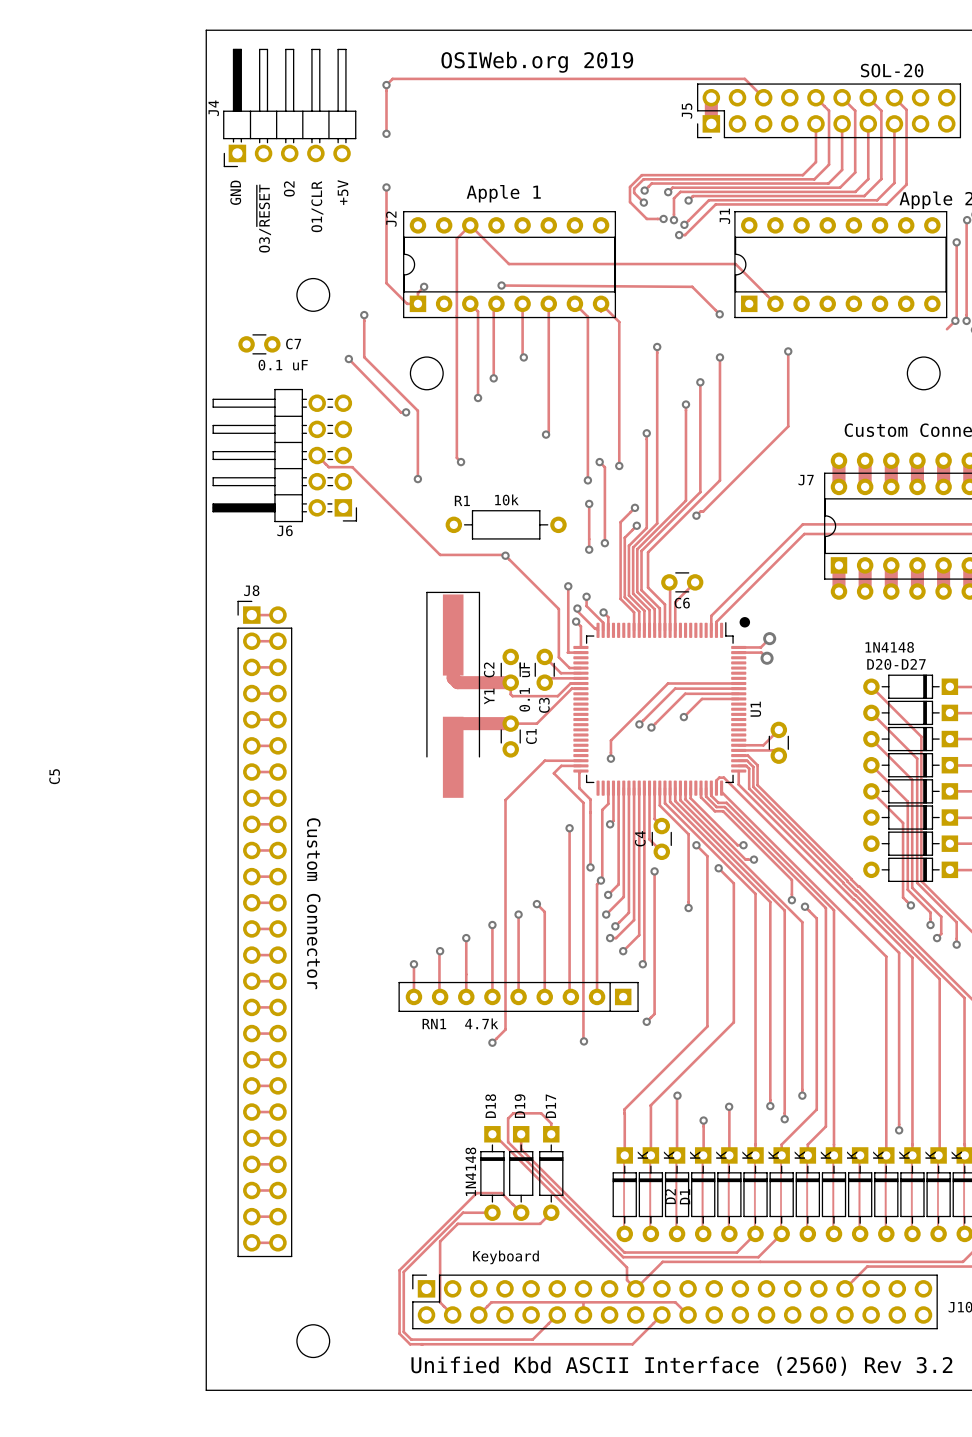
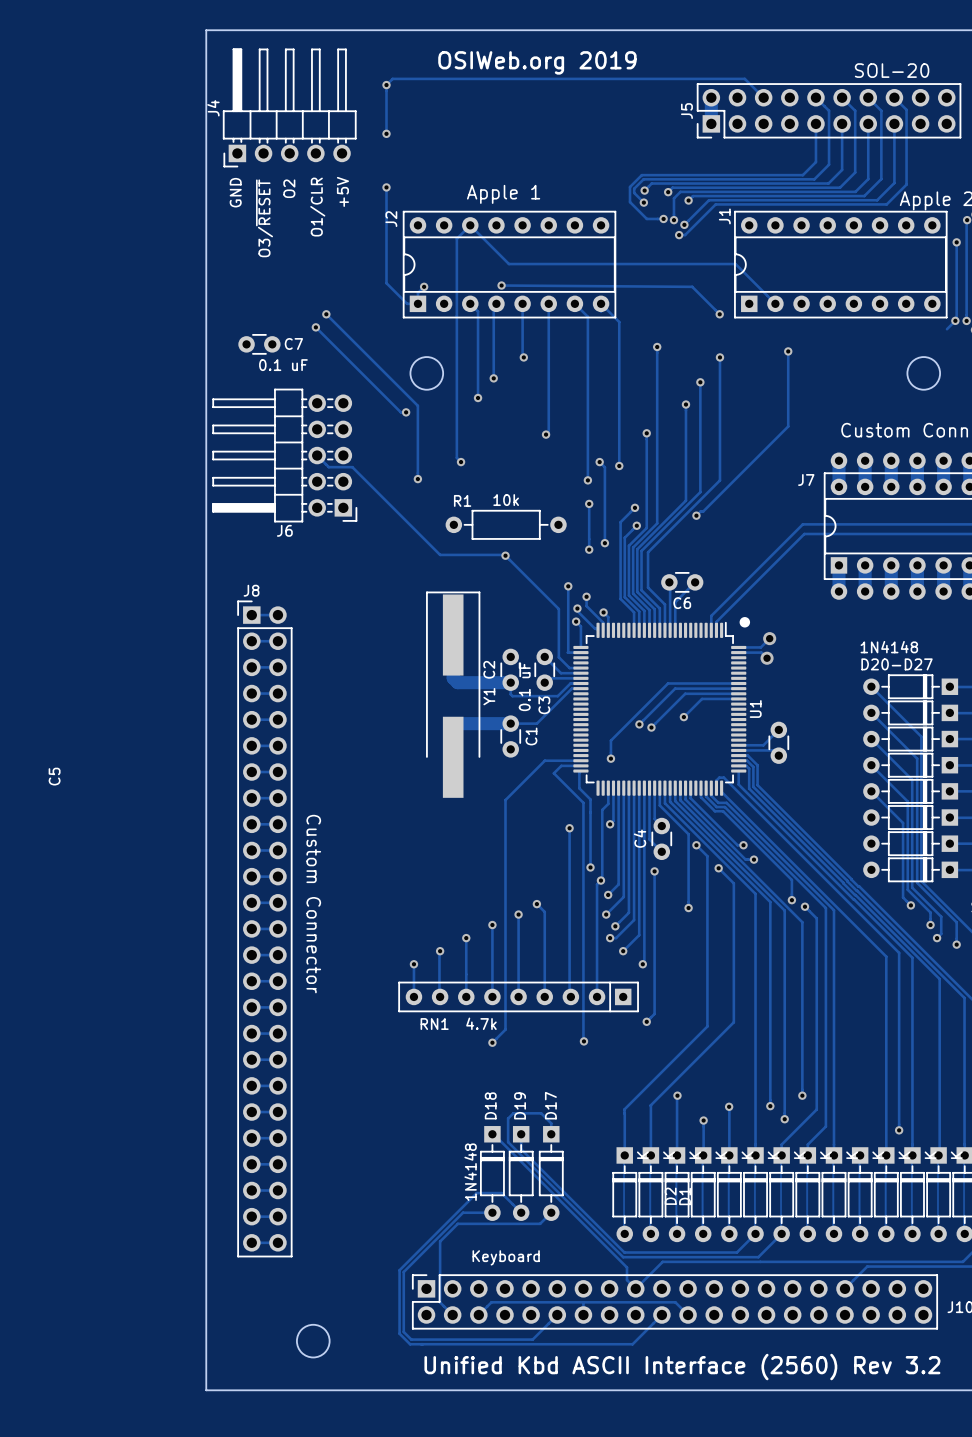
round board edge: [296, 278, 331, 312] -> none
via: none -> (326, 314)
track: (364, 315) (364, 357) (417, 410) -> (326, 314) (417, 405) (417, 410)
via: (364, 315) -> none
via: none -> (315, 327)
track: (348, 359) (400, 412) -> (315, 327) (400, 412)
via: (348, 359) -> none

